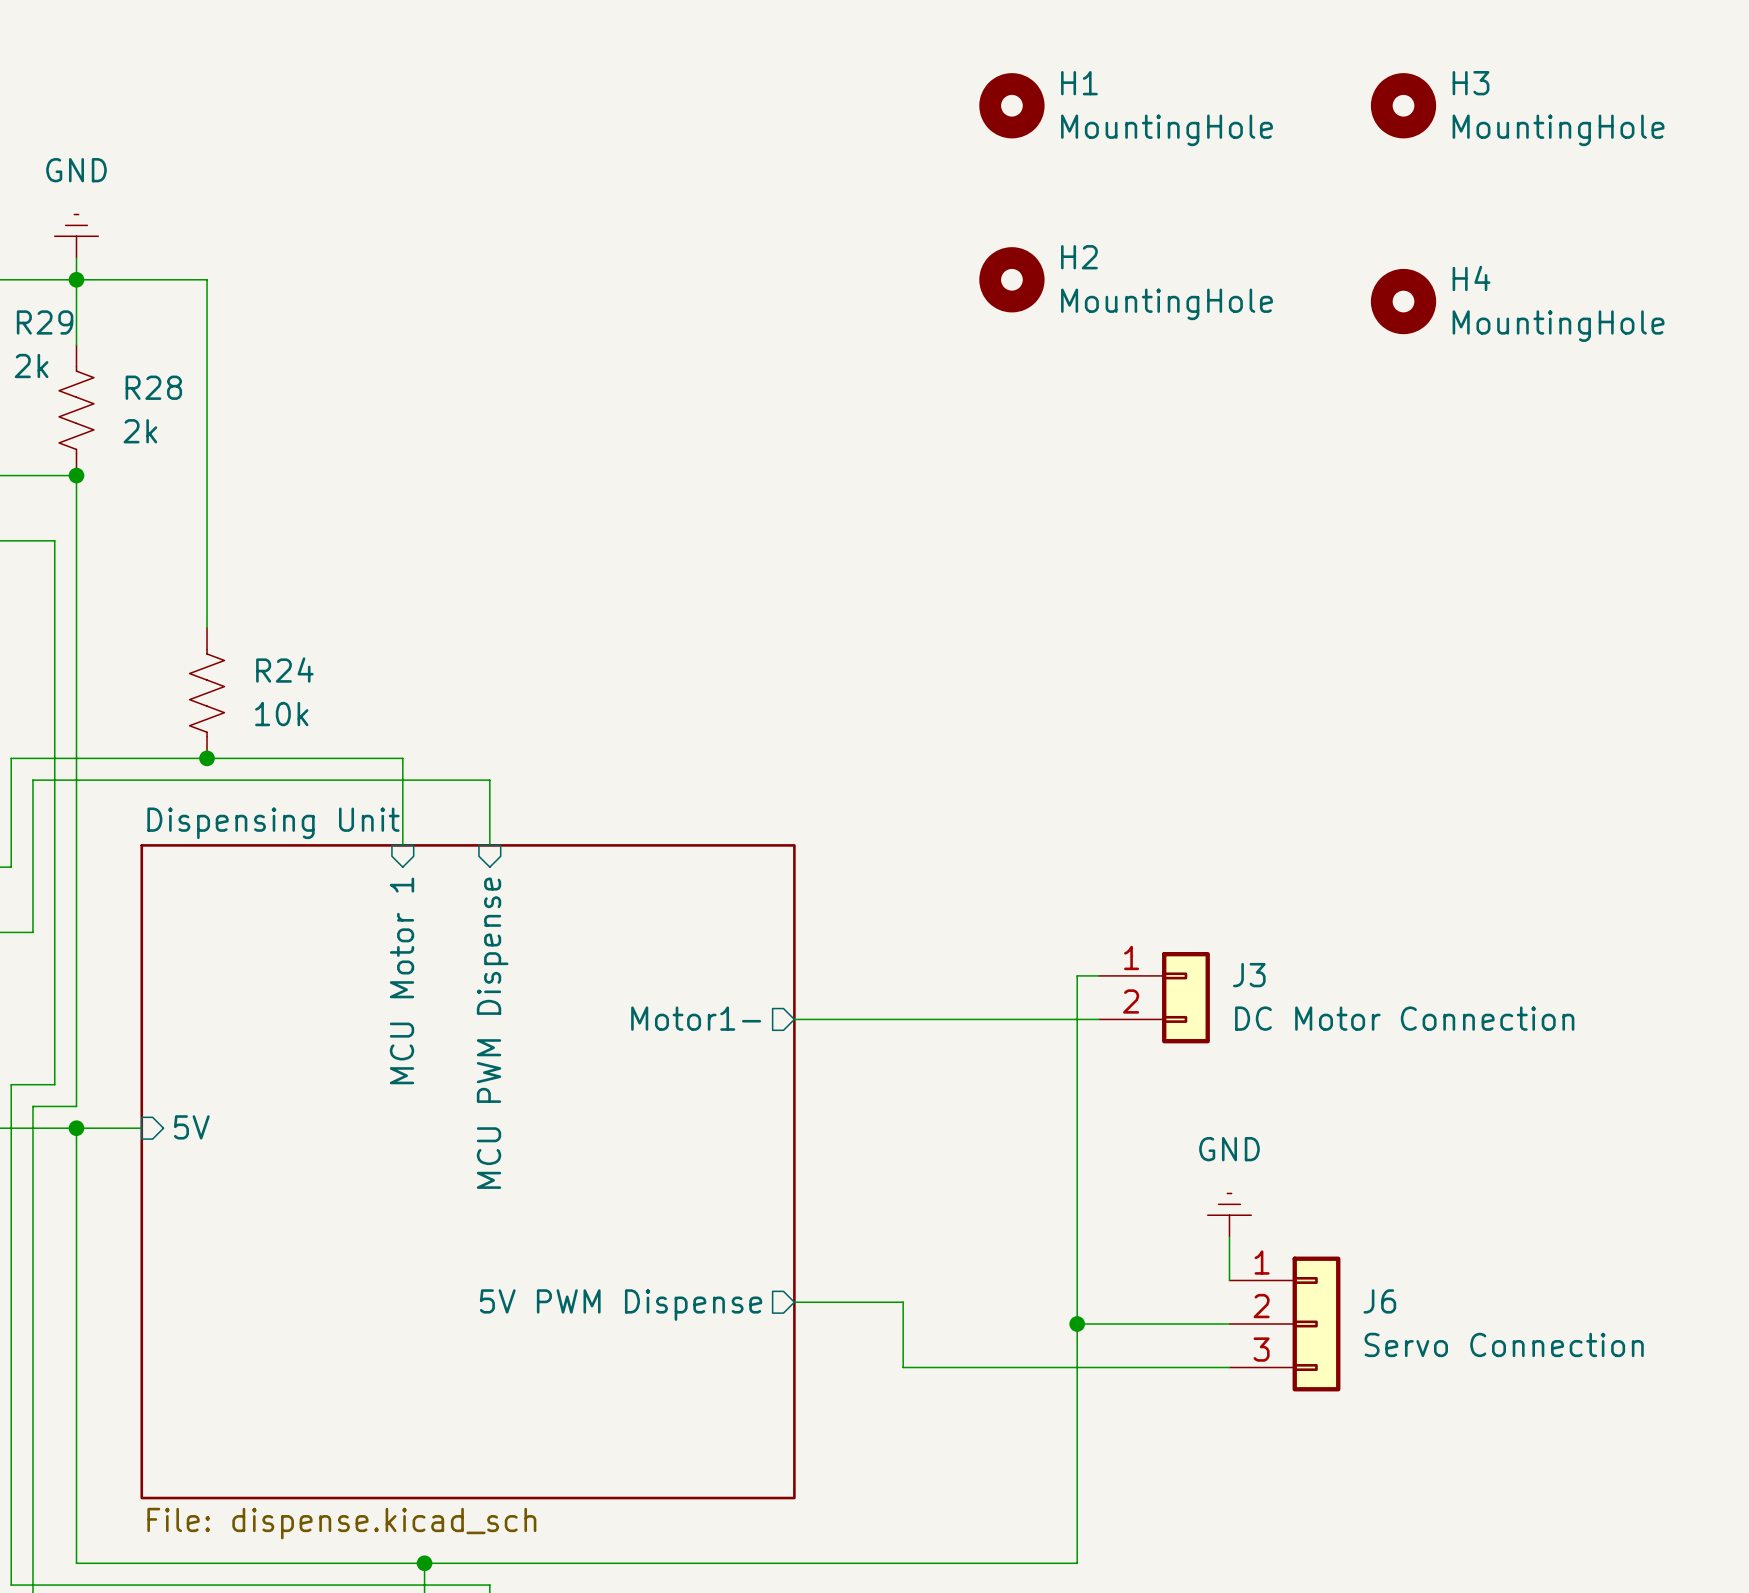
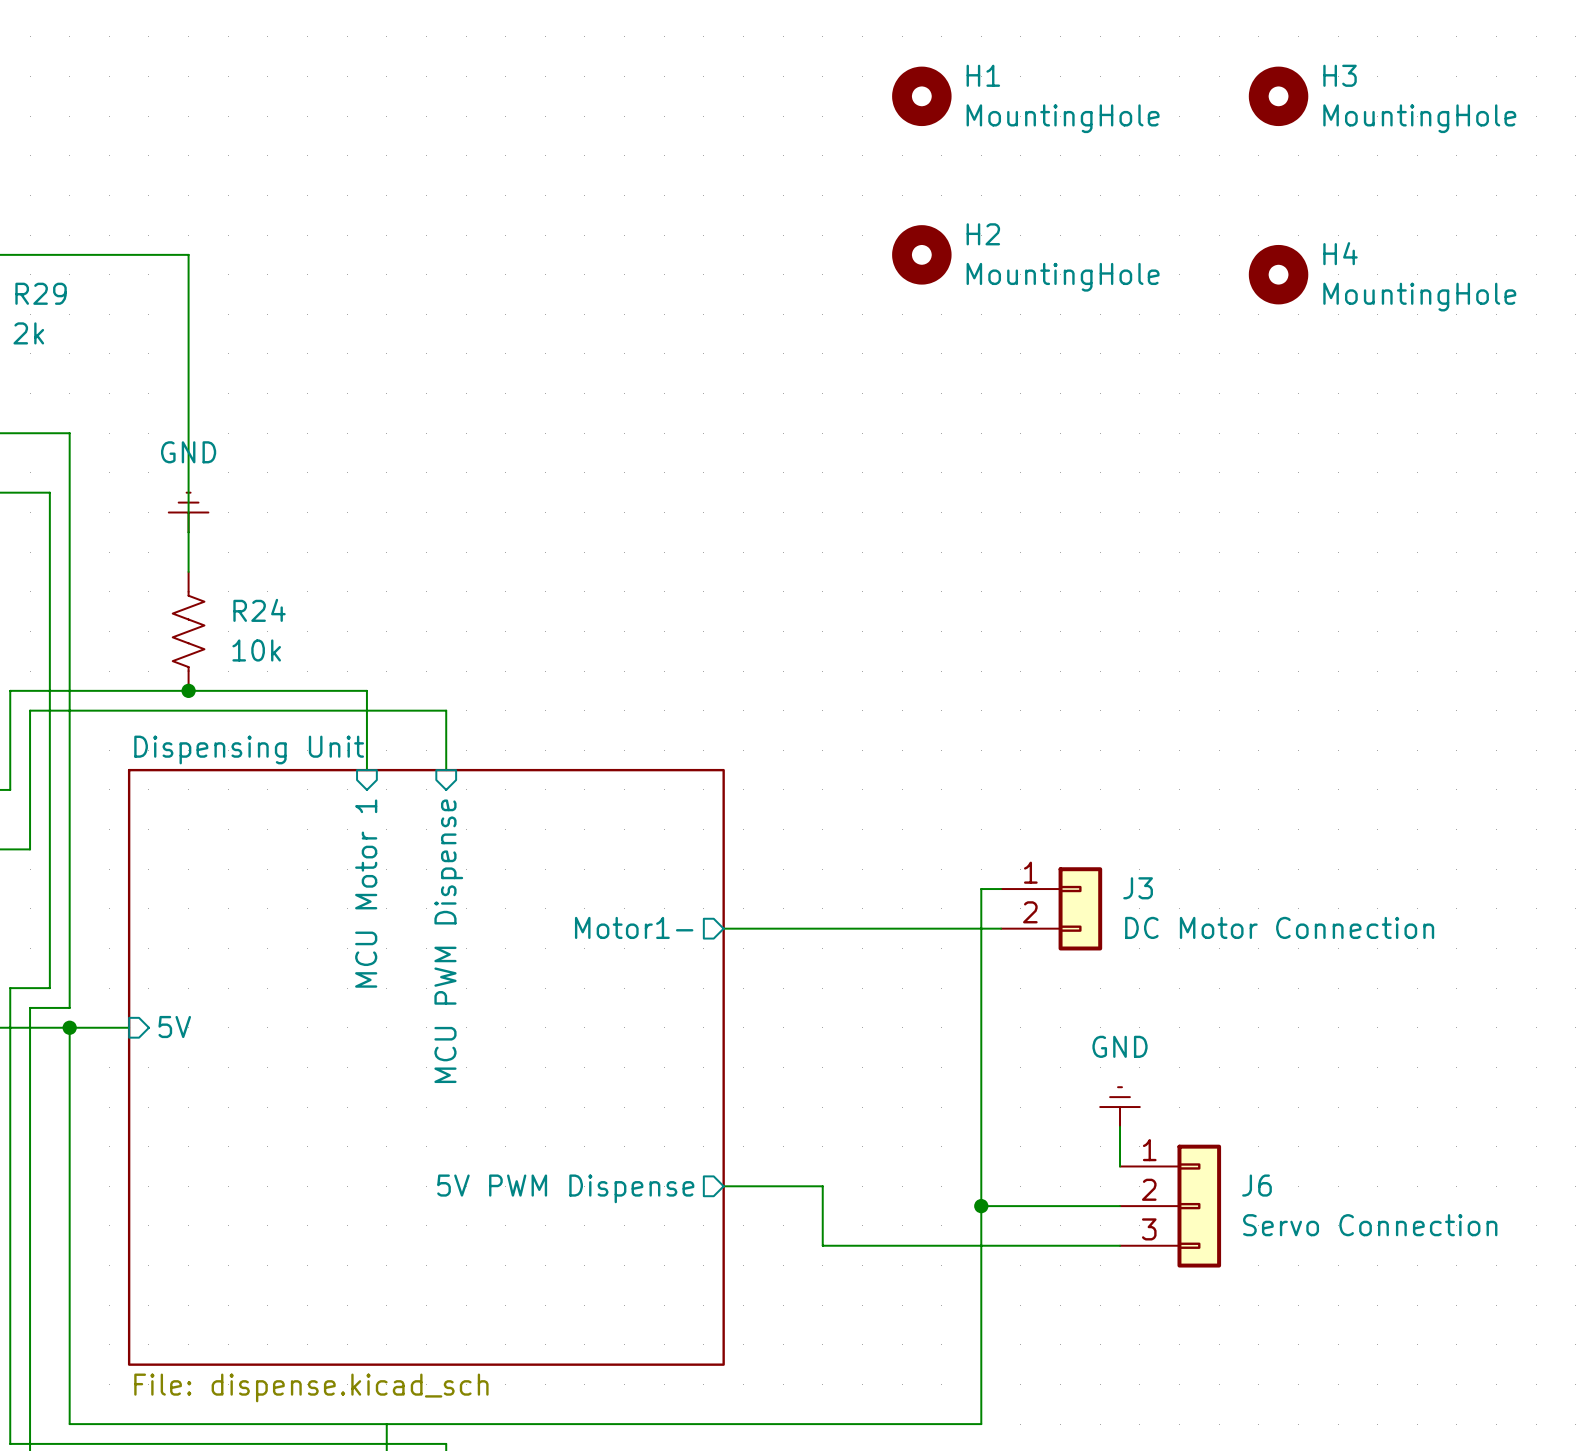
power symbol position: GND (76, 236) -> GND (188, 512)
wire: (76, 258) (76, 345) -> none
junction: (76, 279) -> none
R28: 2k (76, 410) -> none
junction: (76, 475) -> none
junction: (424, 1563) -> none

